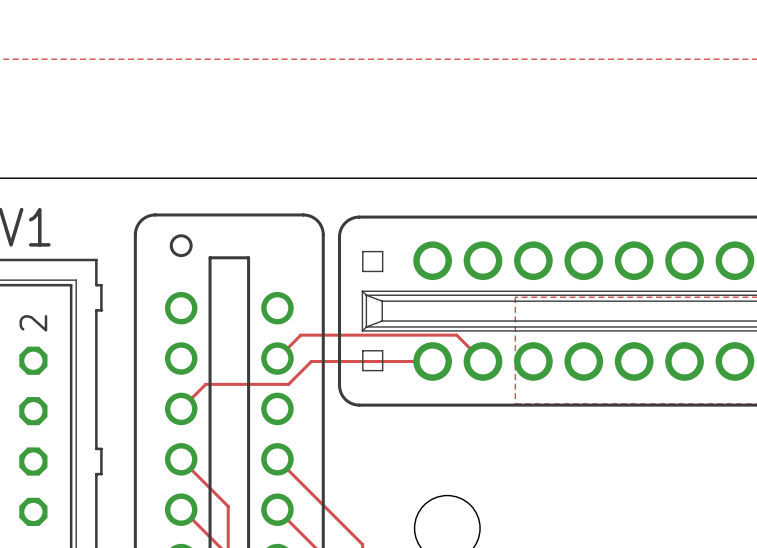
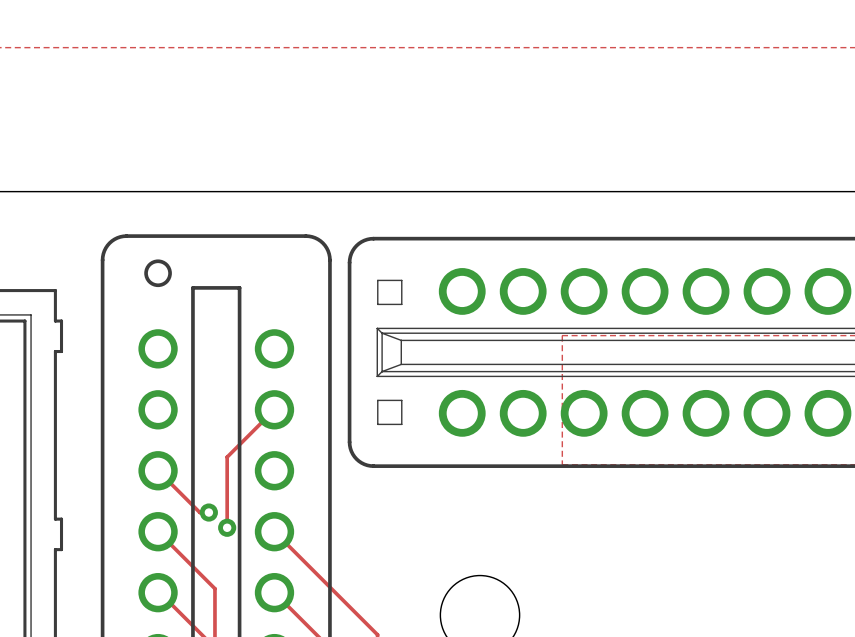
track: (277, 358) (300, 335) (456, 335) (483, 361) -> (274, 409) (227, 457) (227, 527)
track: (432, 361) (311, 361) (288, 384) (205, 384) (181, 408) -> (208, 512) (199, 512) (158, 470)
via: none -> (208, 512)
via: none -> (227, 527)

